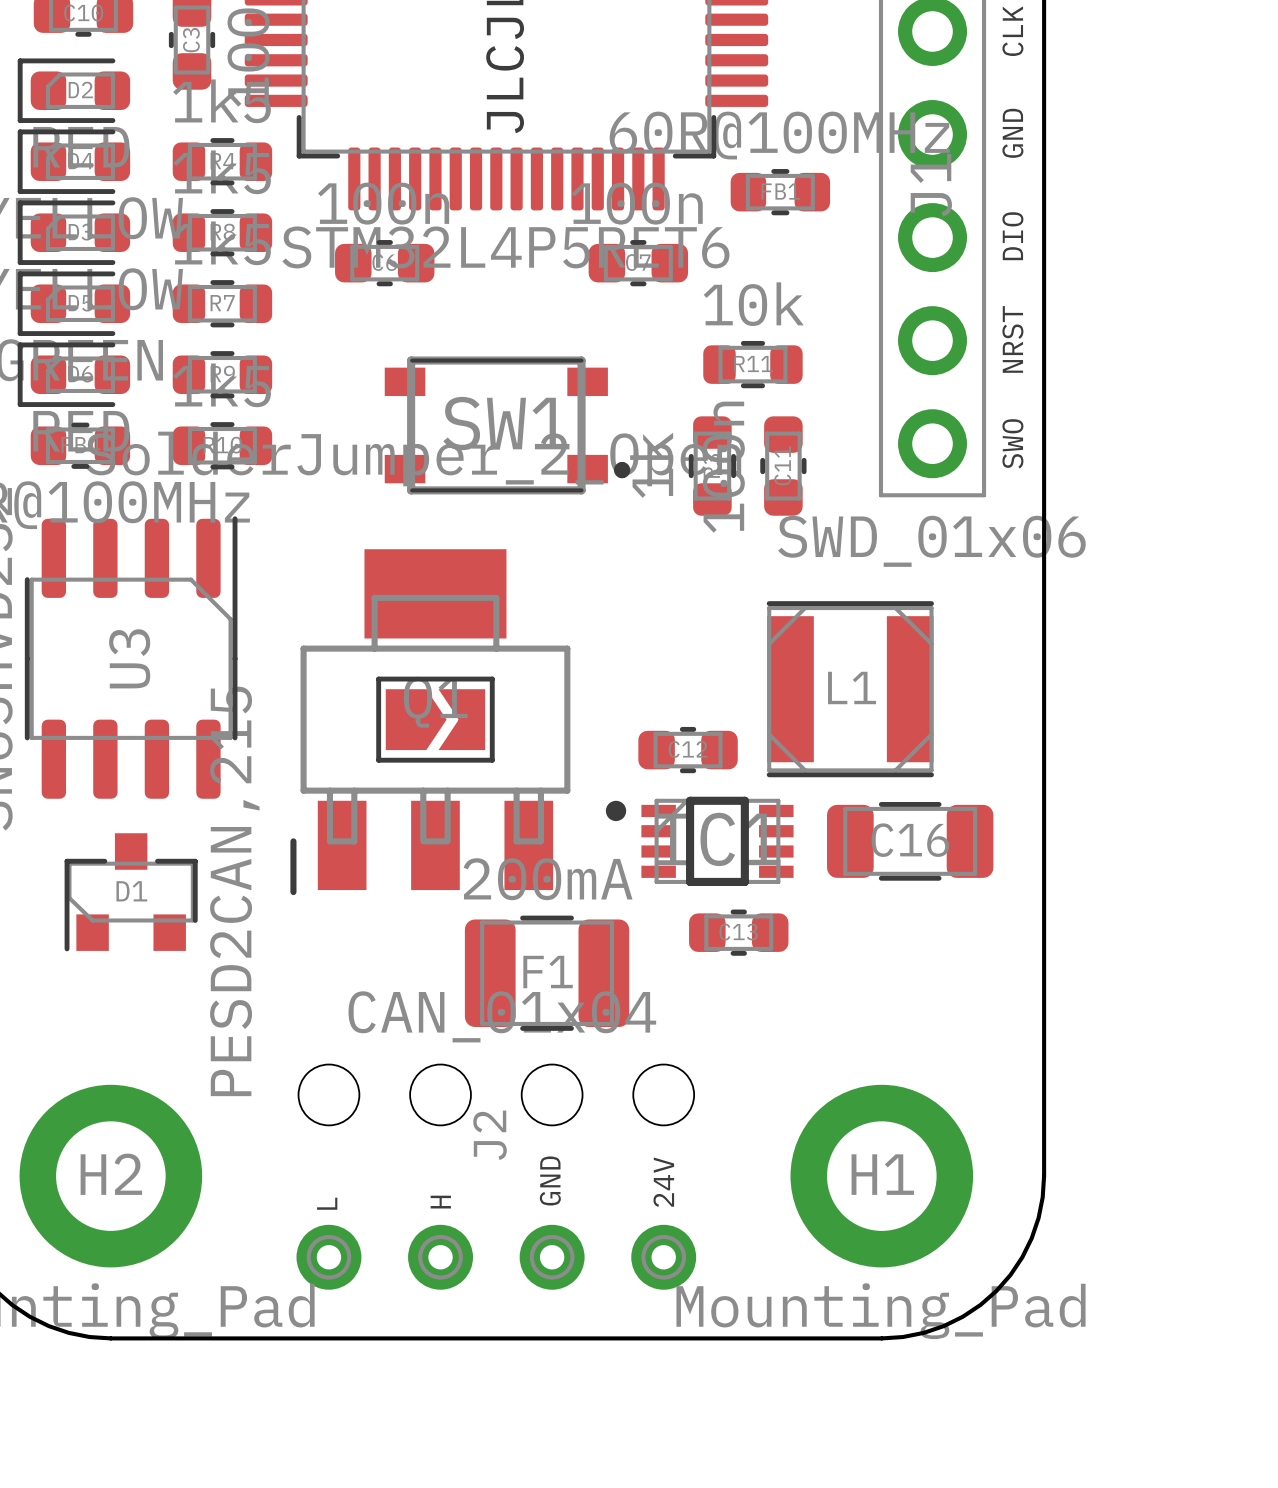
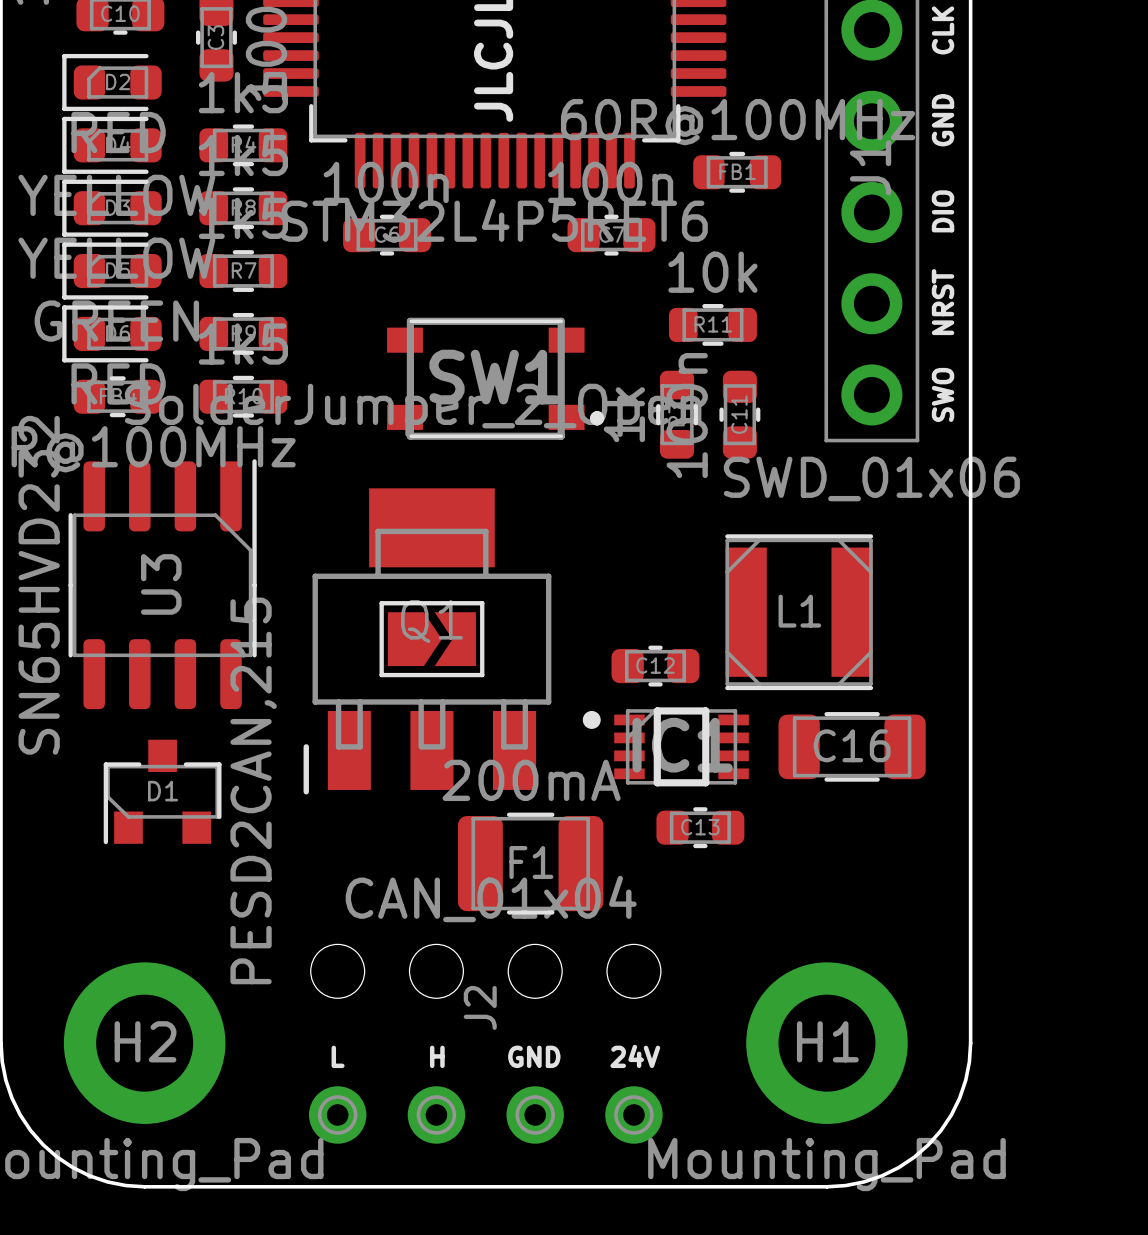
text rotation: 0° (550, 1180) -> 90° clockwise (534, 1056)
text rotation: 0° (663, 1182) -> 90° clockwise (635, 1056)
text rotation: 0° (440, 1202) -> 90° clockwise (437, 1056)
text rotation: 0° (327, 1203) -> 90° clockwise (338, 1056)

